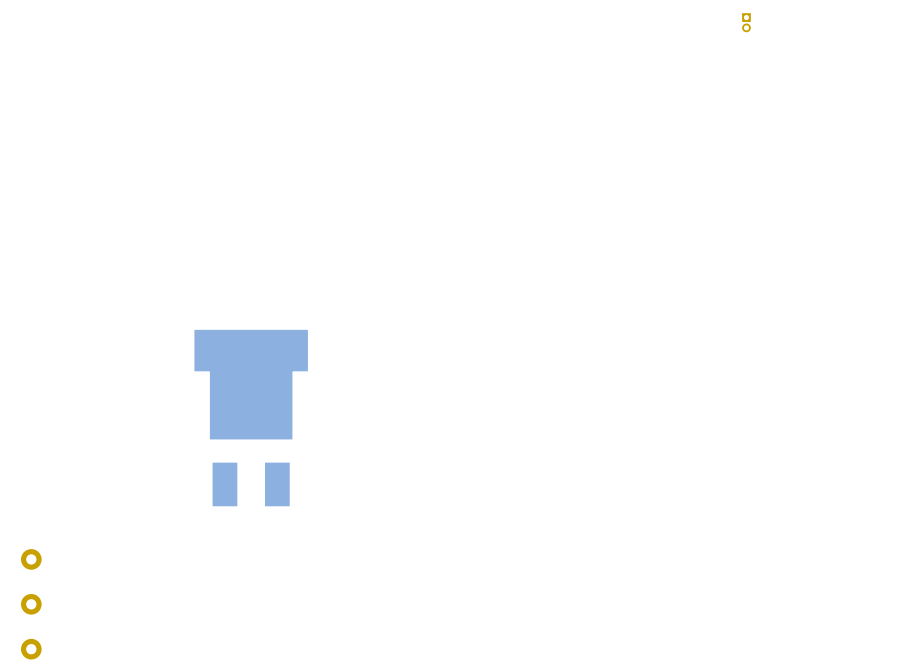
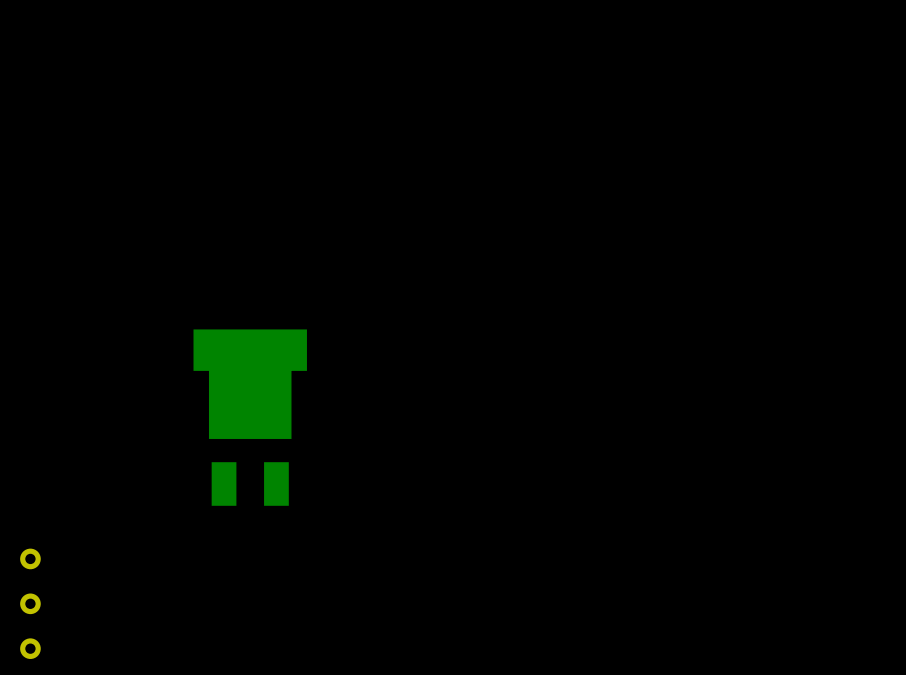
part: (746, 22) -> none

